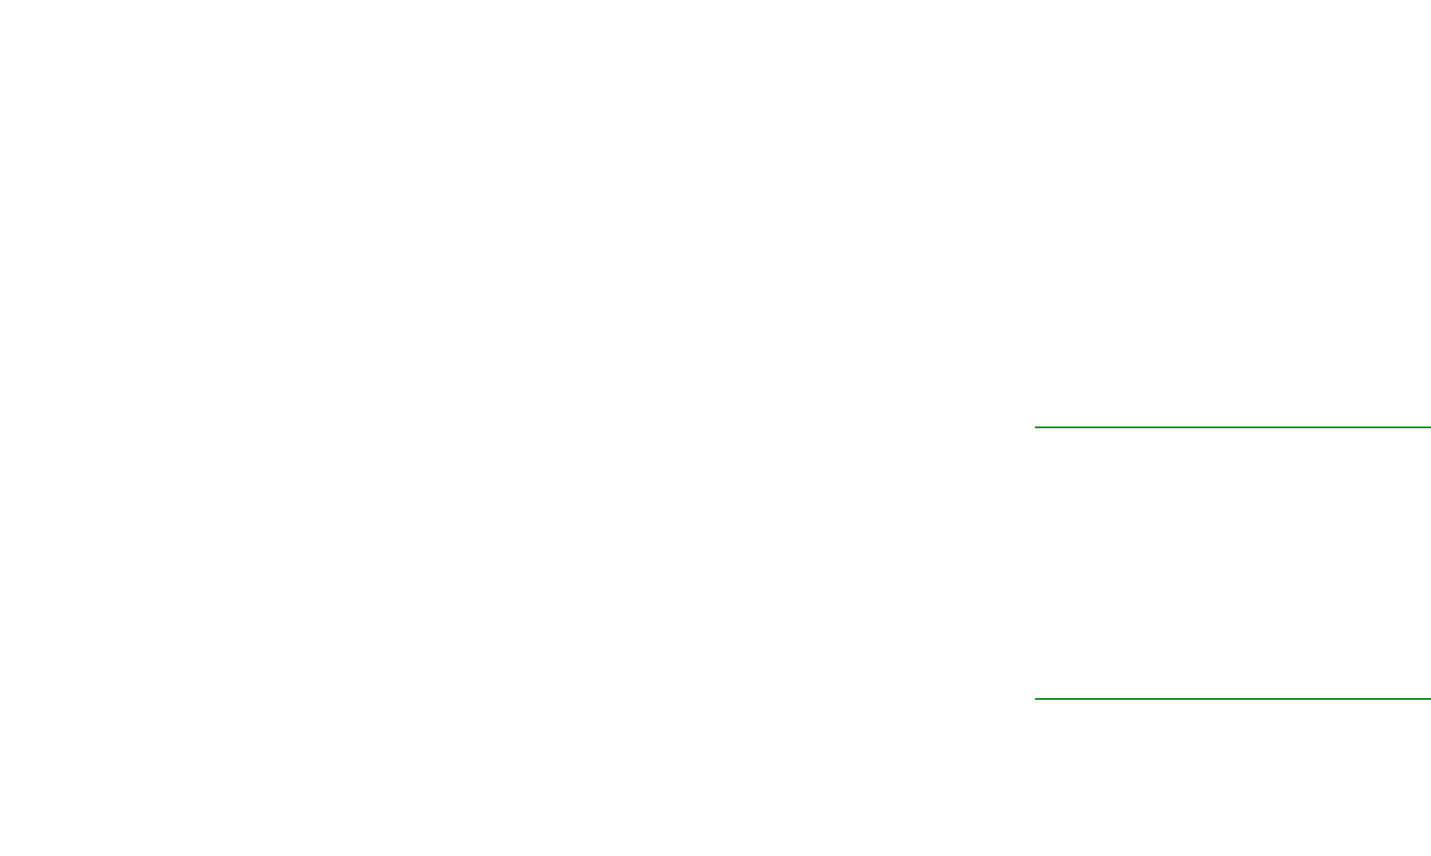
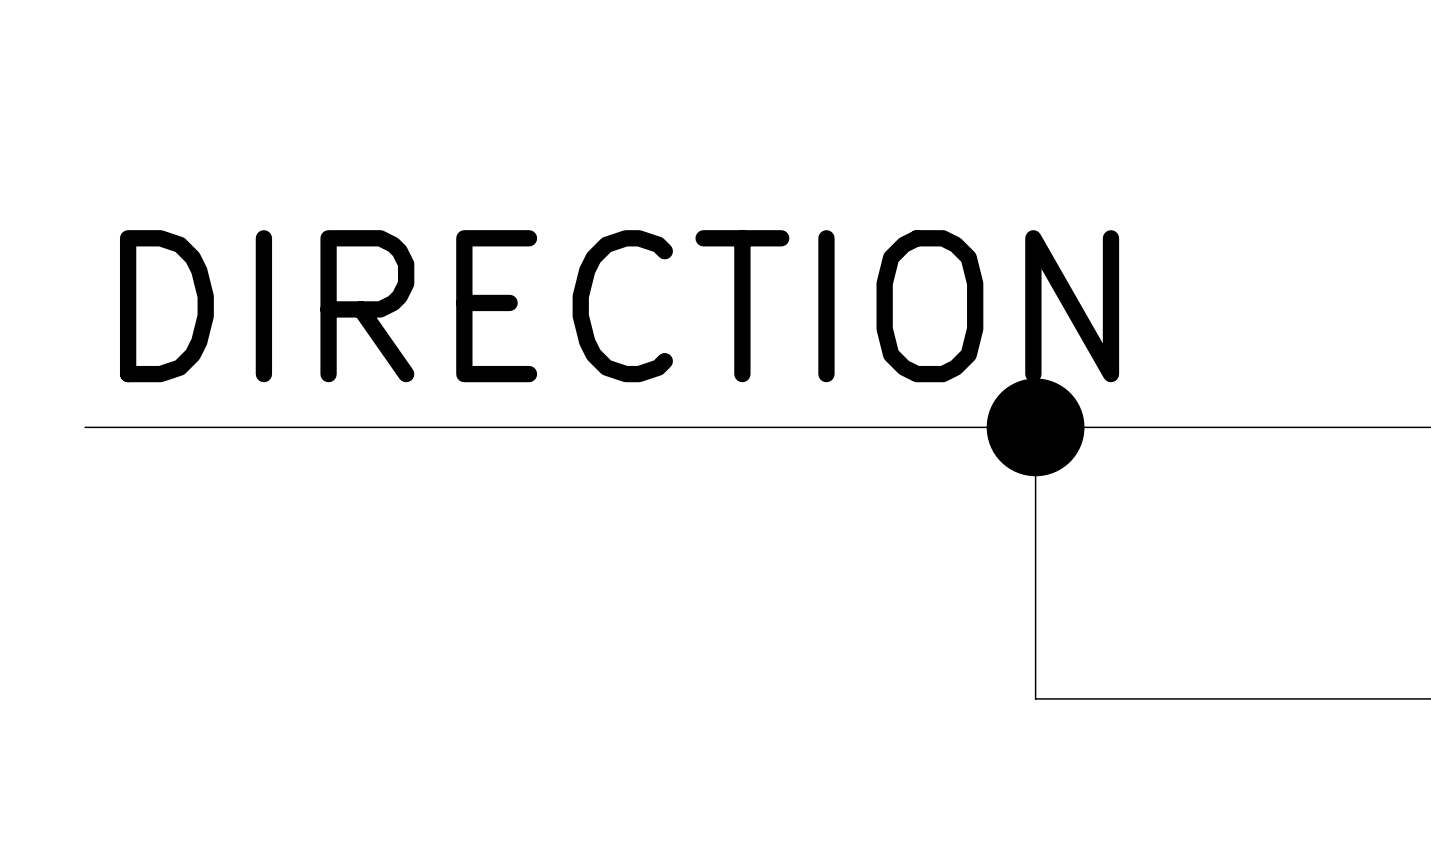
label: none -> DIRECTION (619, 306)
wire: none -> (85, 427) (1035, 427) (1035, 698)
junction: none -> (1035, 427)

